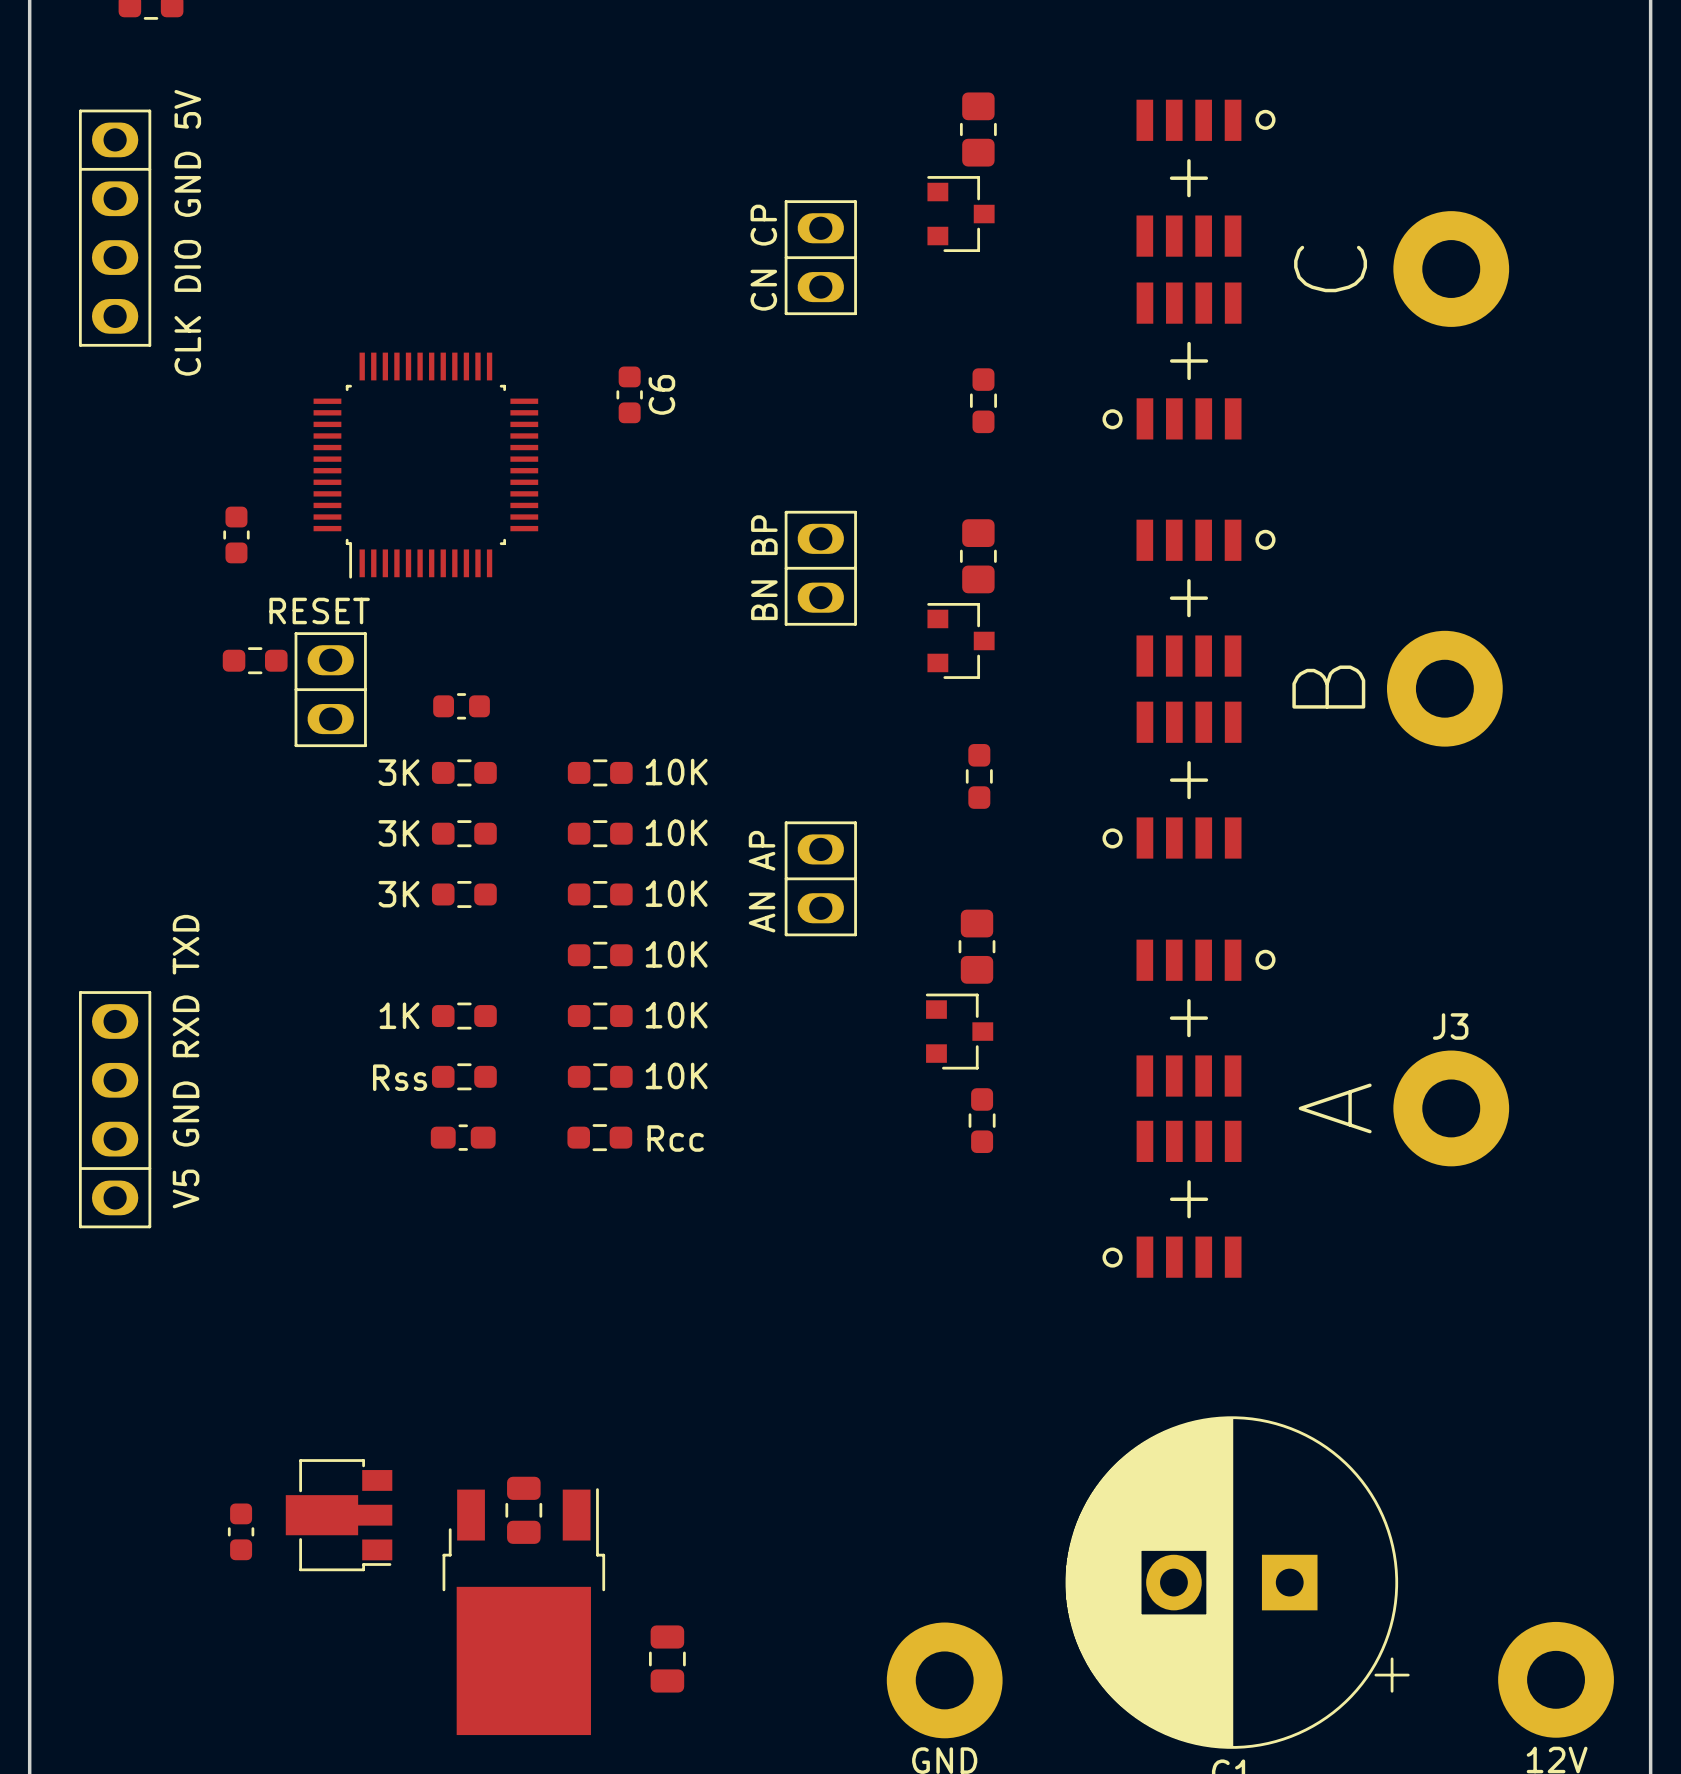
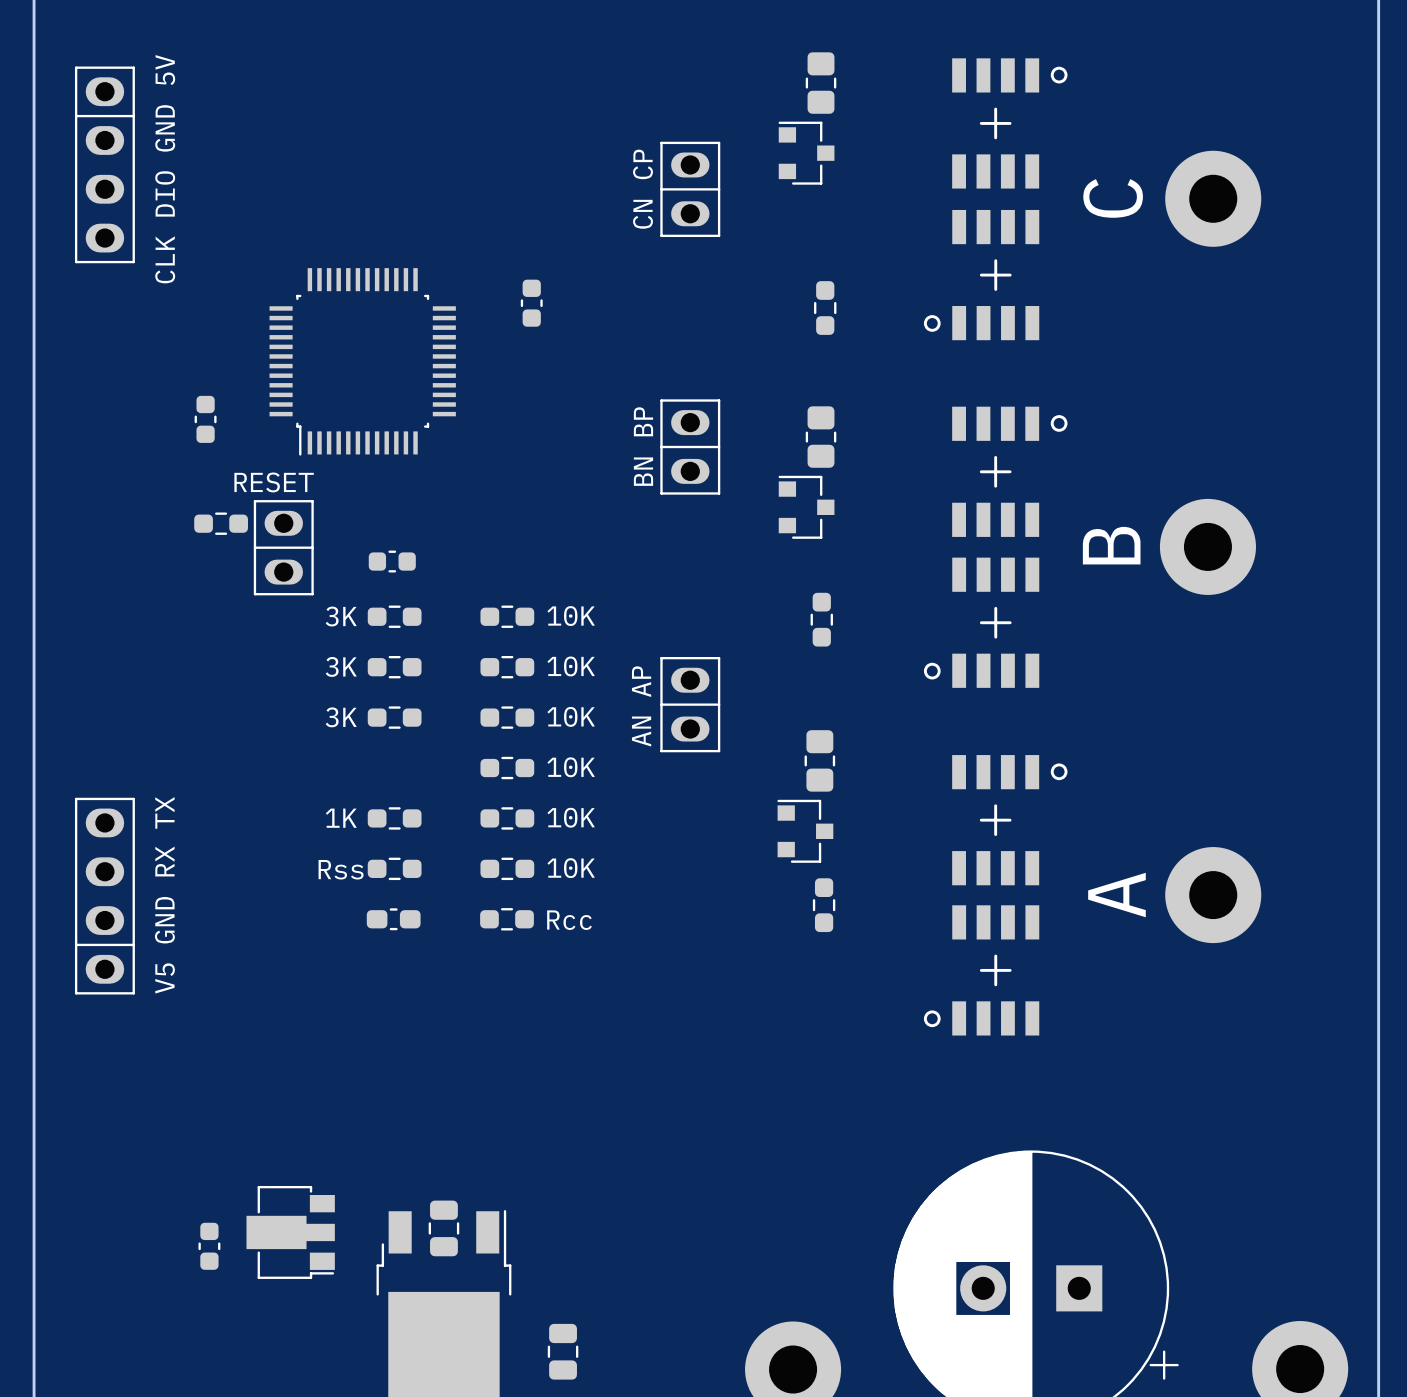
C6 name: C6 (661, 394) -> none
J3 name: J3 (1450, 1026) -> none
part value: V5 GND RXD TXD (186, 1061) -> V5 GND RX TX (164, 895)

